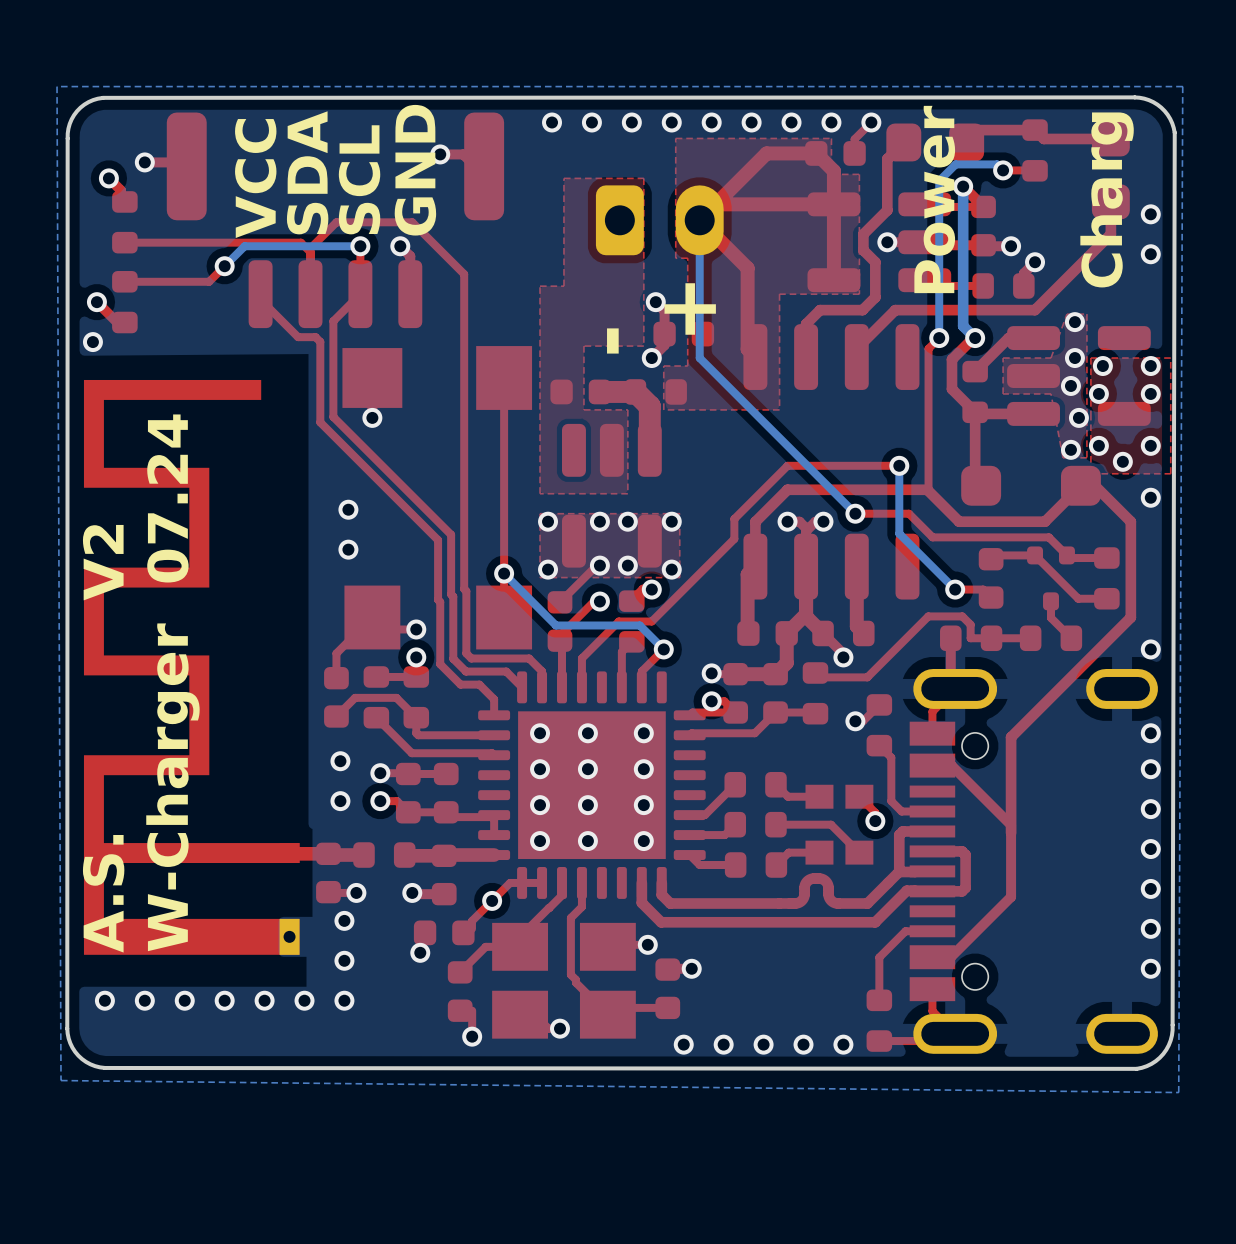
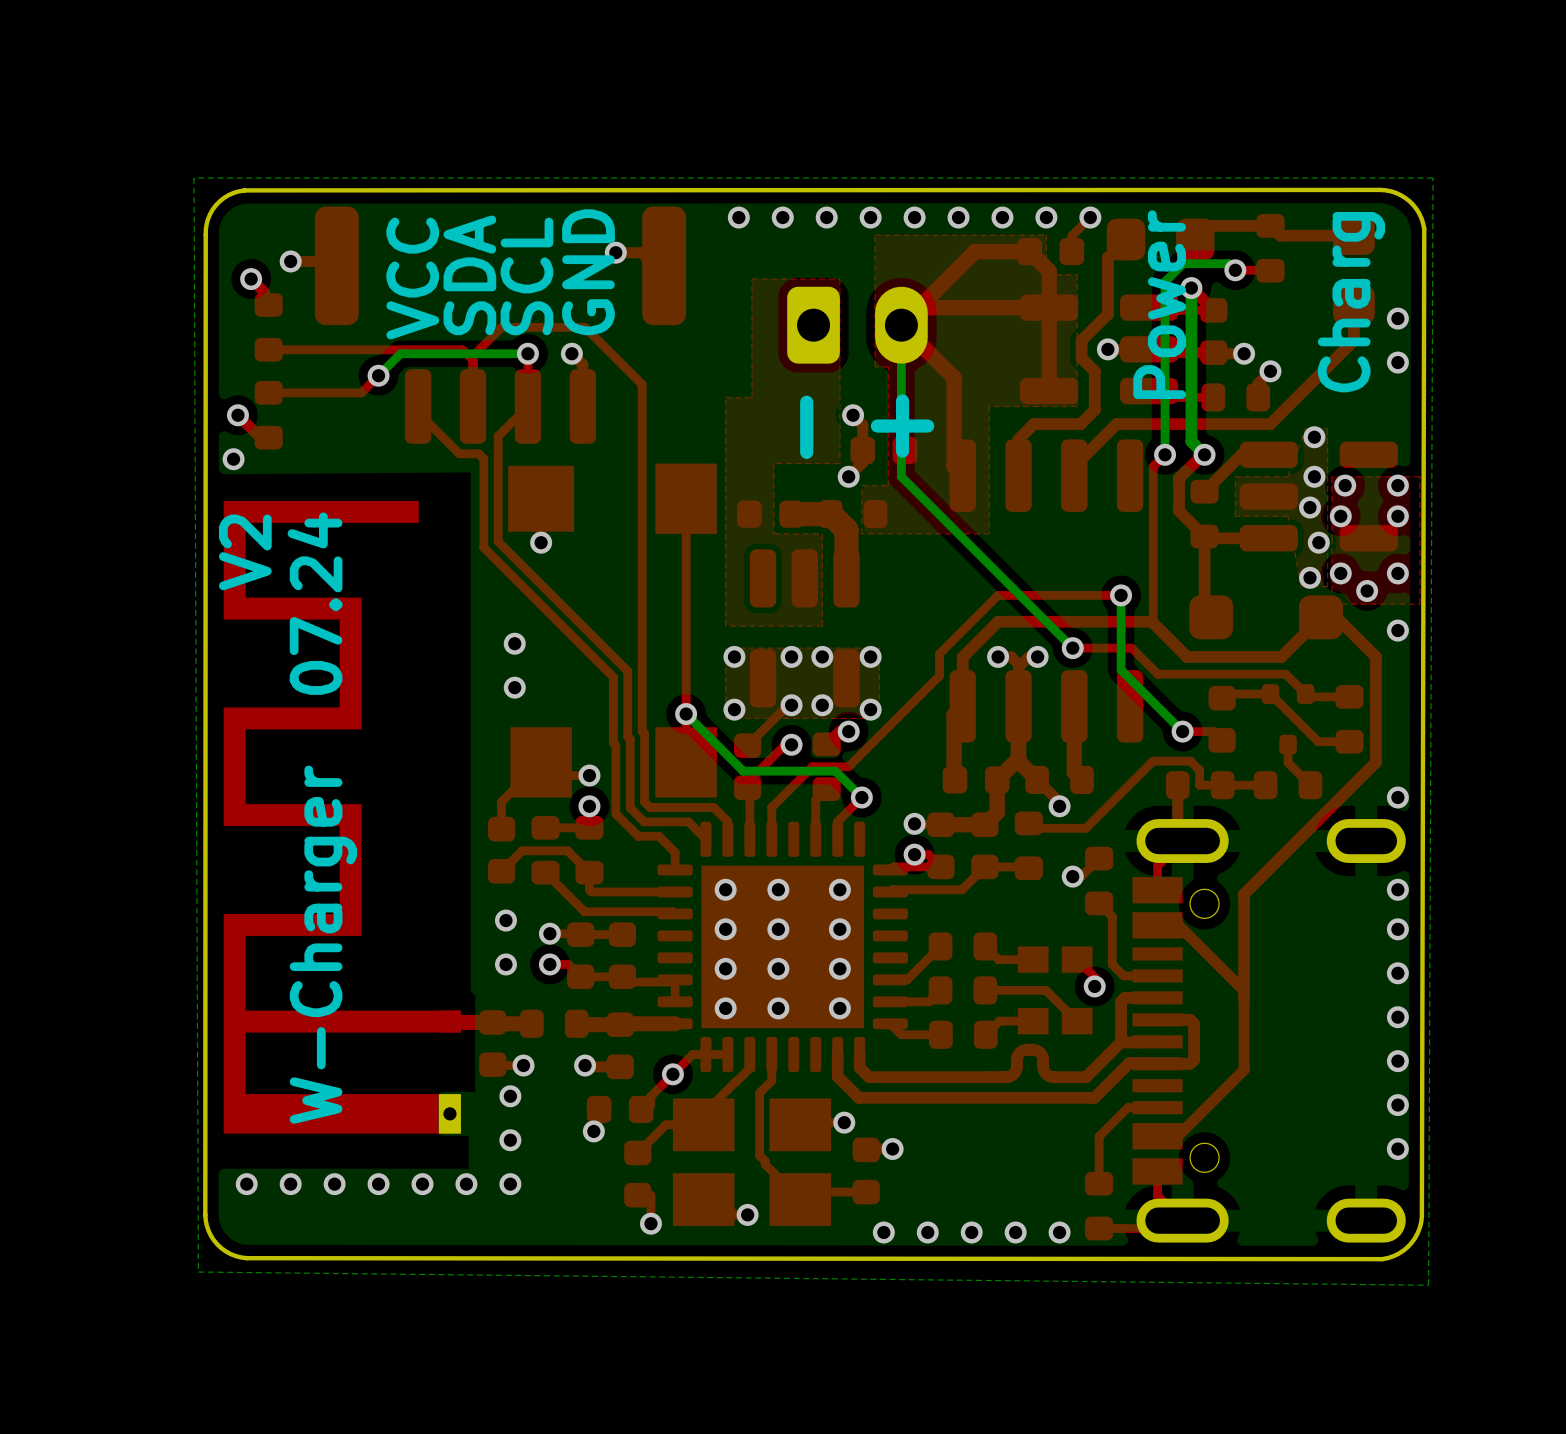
text: A.S. V2 (103, 738) -> V2 (245, 552)

